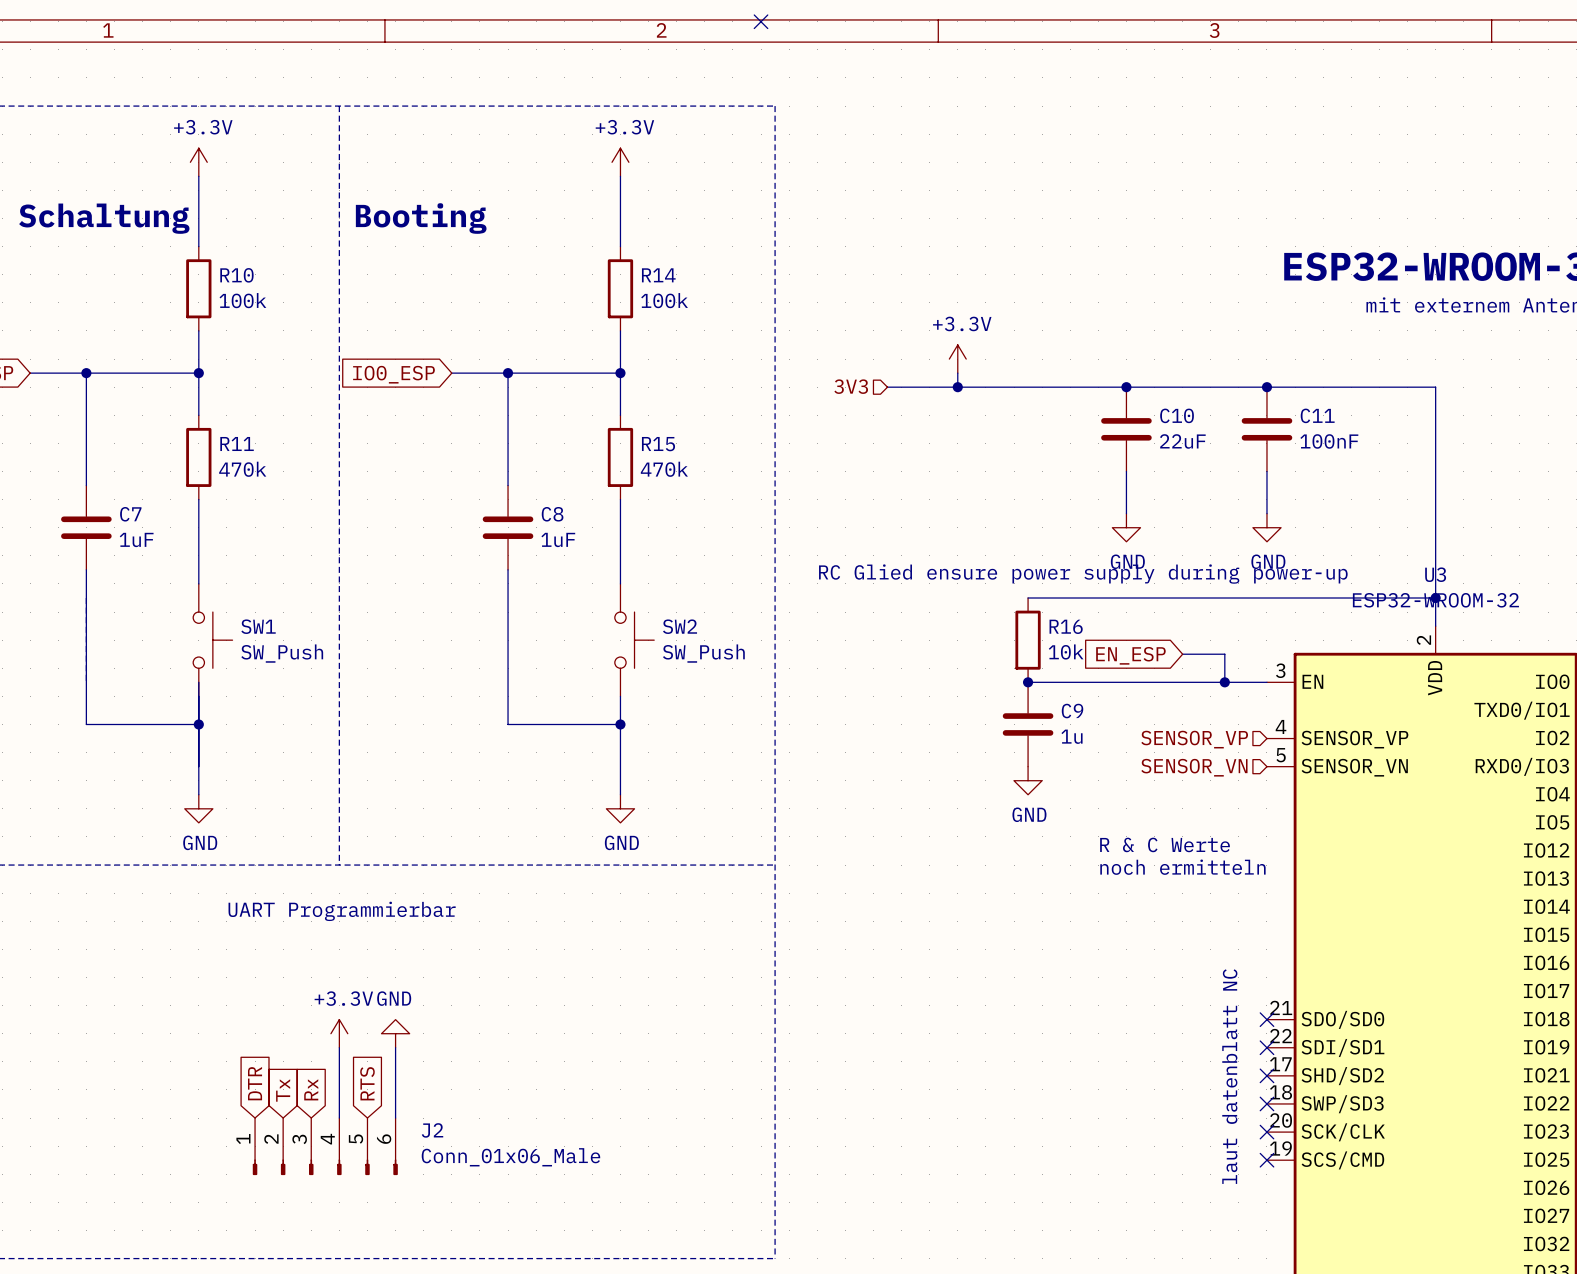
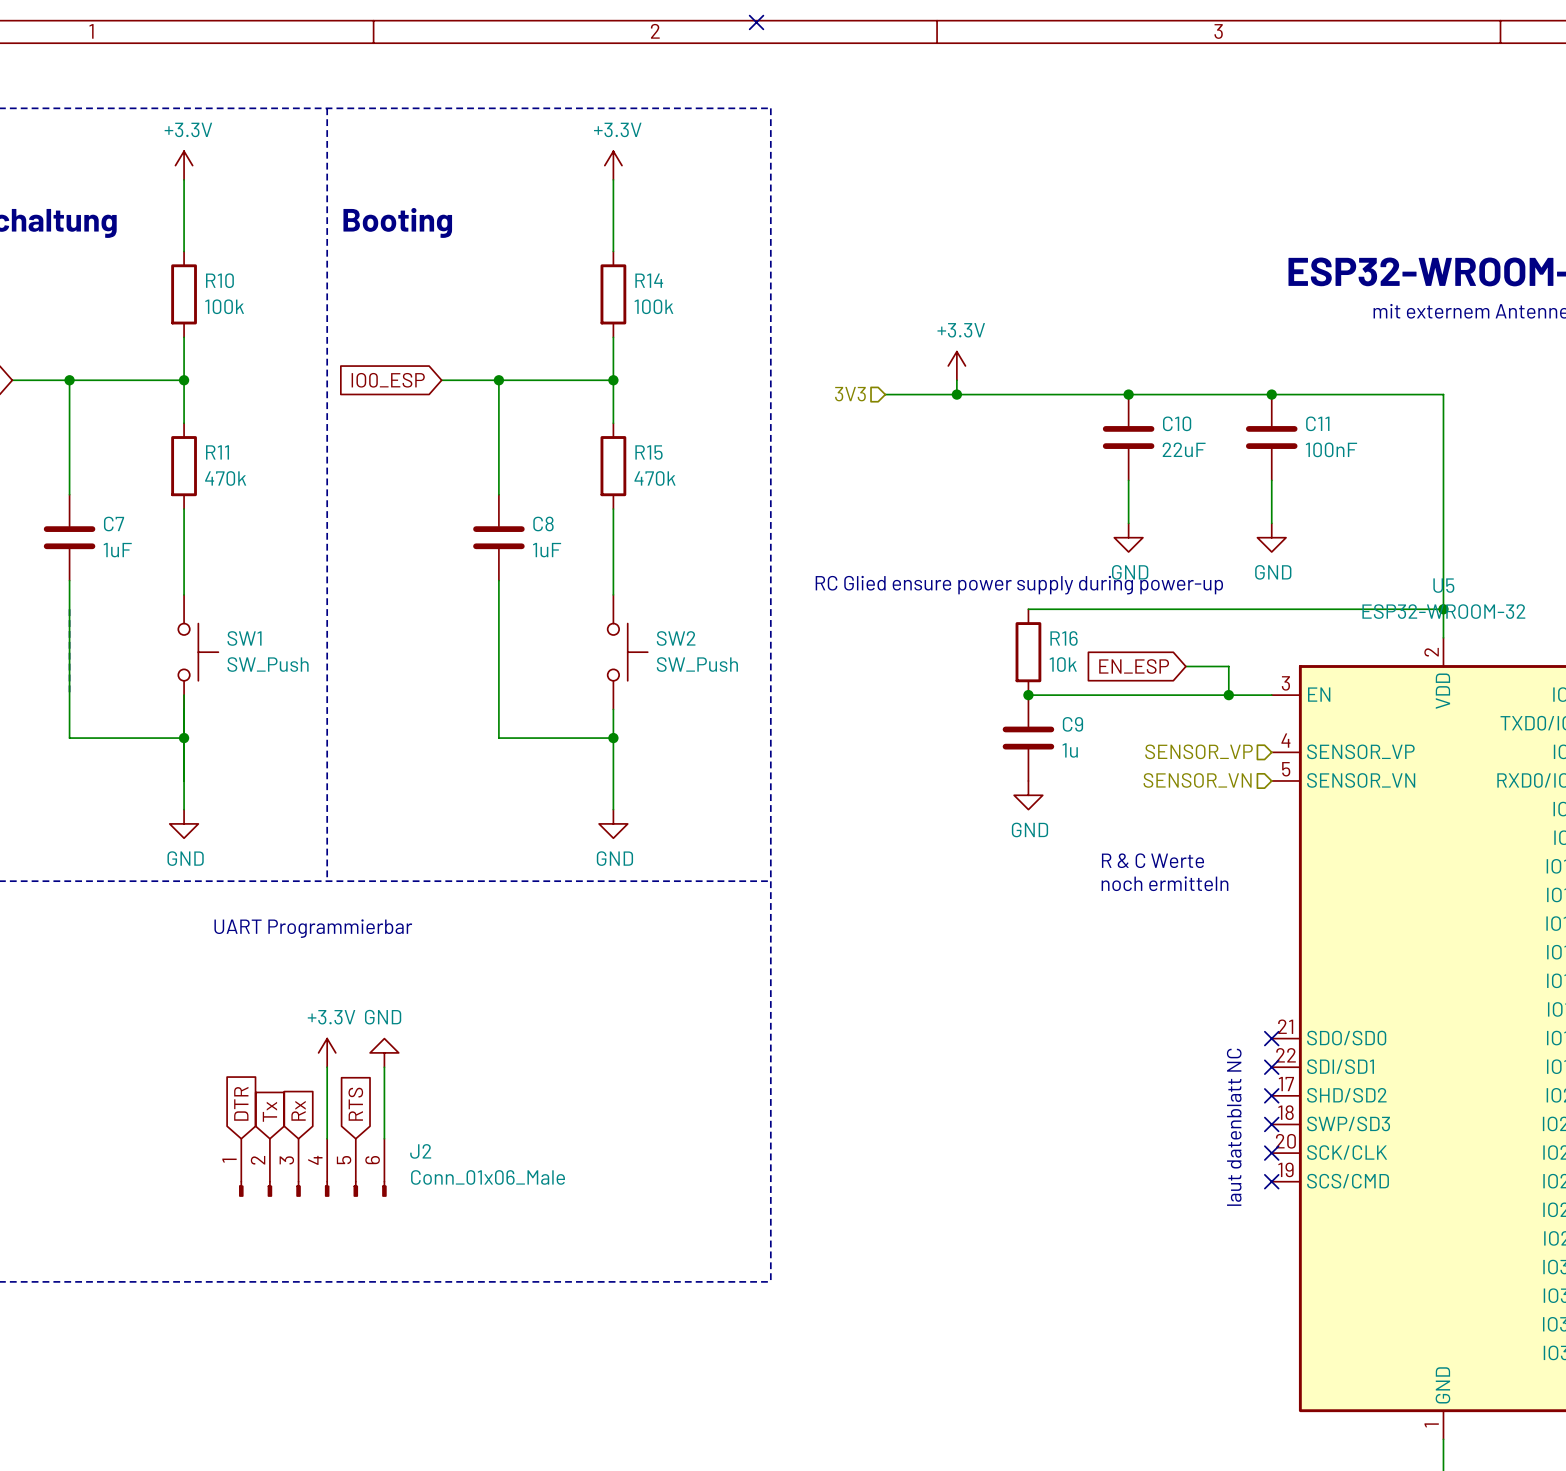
U3 name: U3 (1435, 574) -> U5 (1443, 585)

